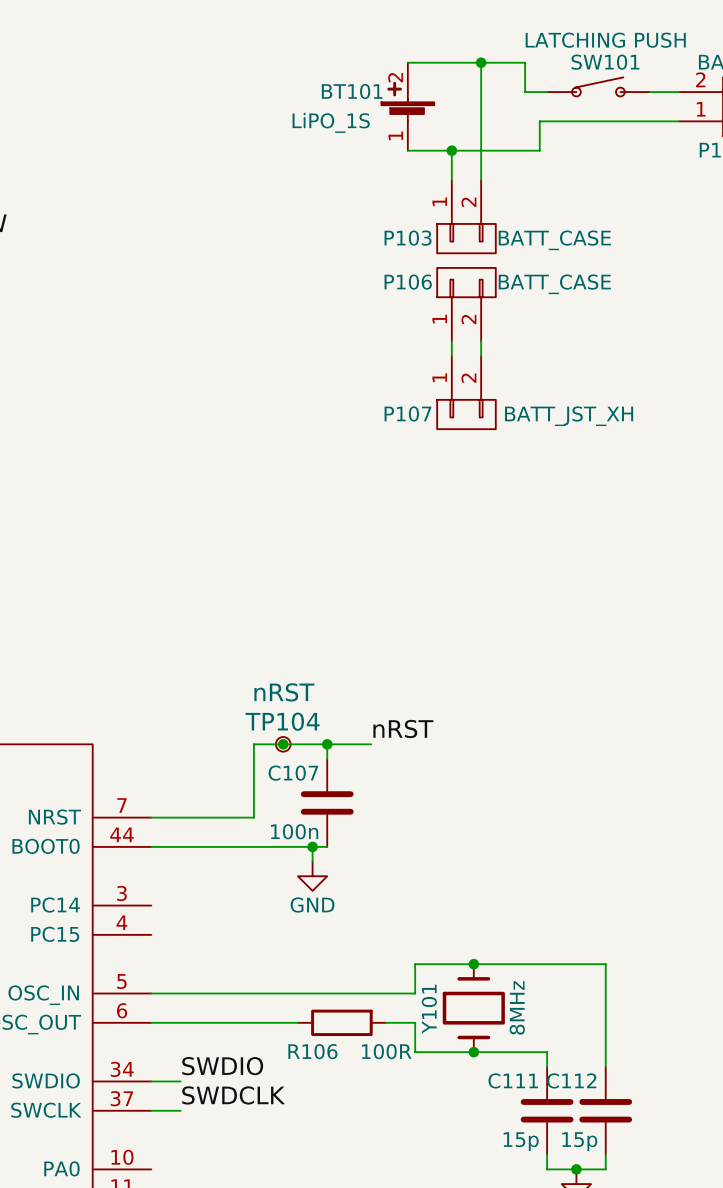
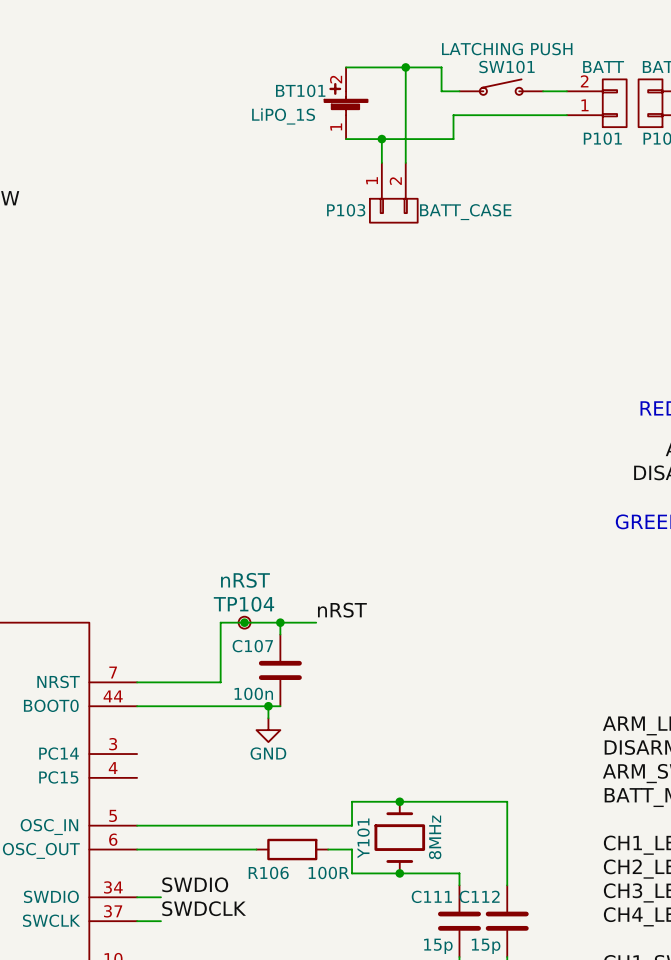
P106: BATT_CASE (466, 304) -> none
wire: (451, 341) (451, 355) -> none
wire: (481, 341) (481, 355) -> none
P107: BATT_JST_XH (466, 392) -> none

